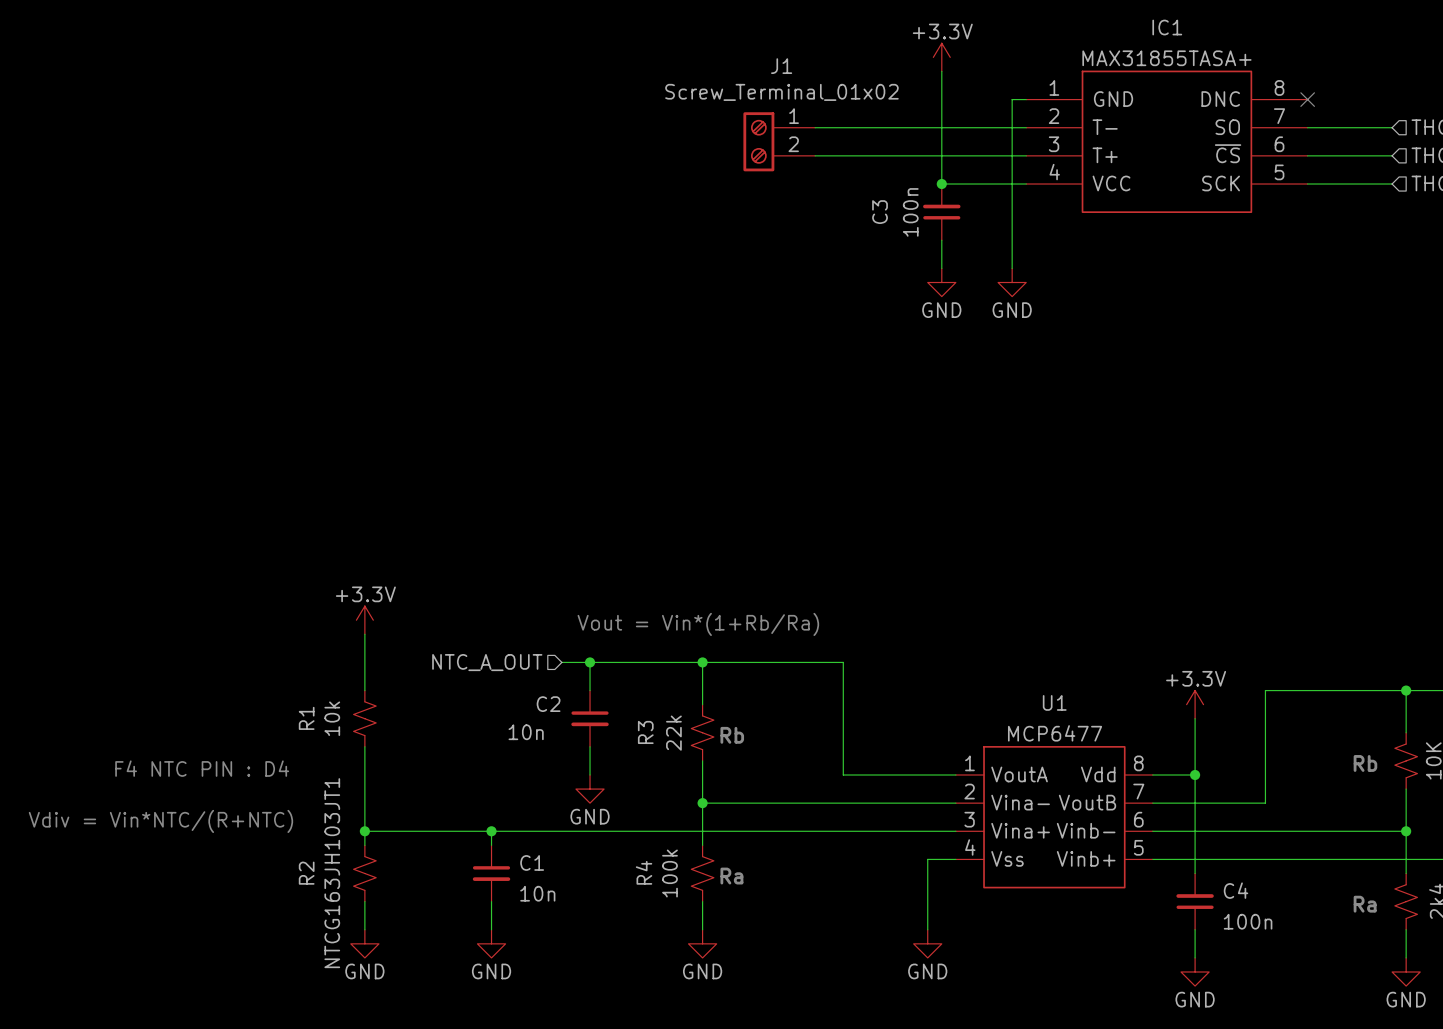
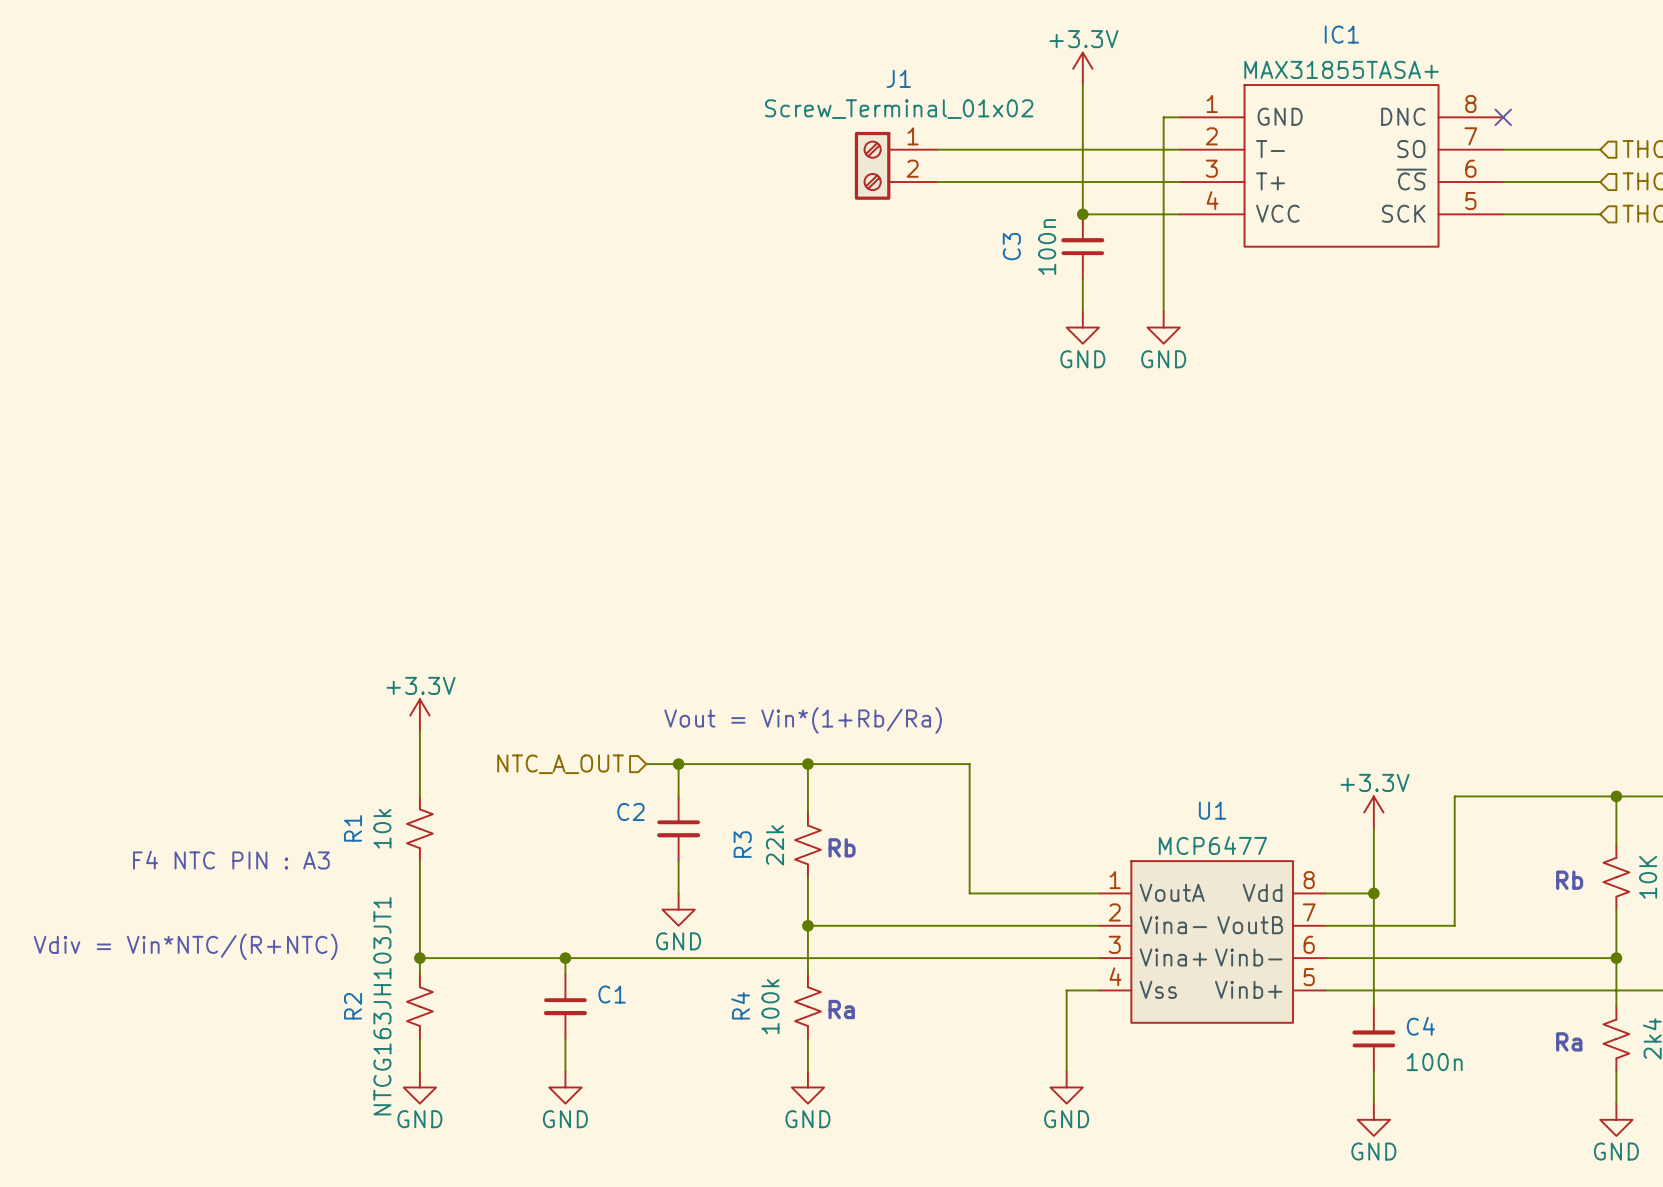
C2 value: 10n (526, 732) -> none
text: F4 NTC PIN : D4 (202, 768) -> F4 NTC PIN : A3 (231, 860)
C1 value: 10n (537, 893) -> none

